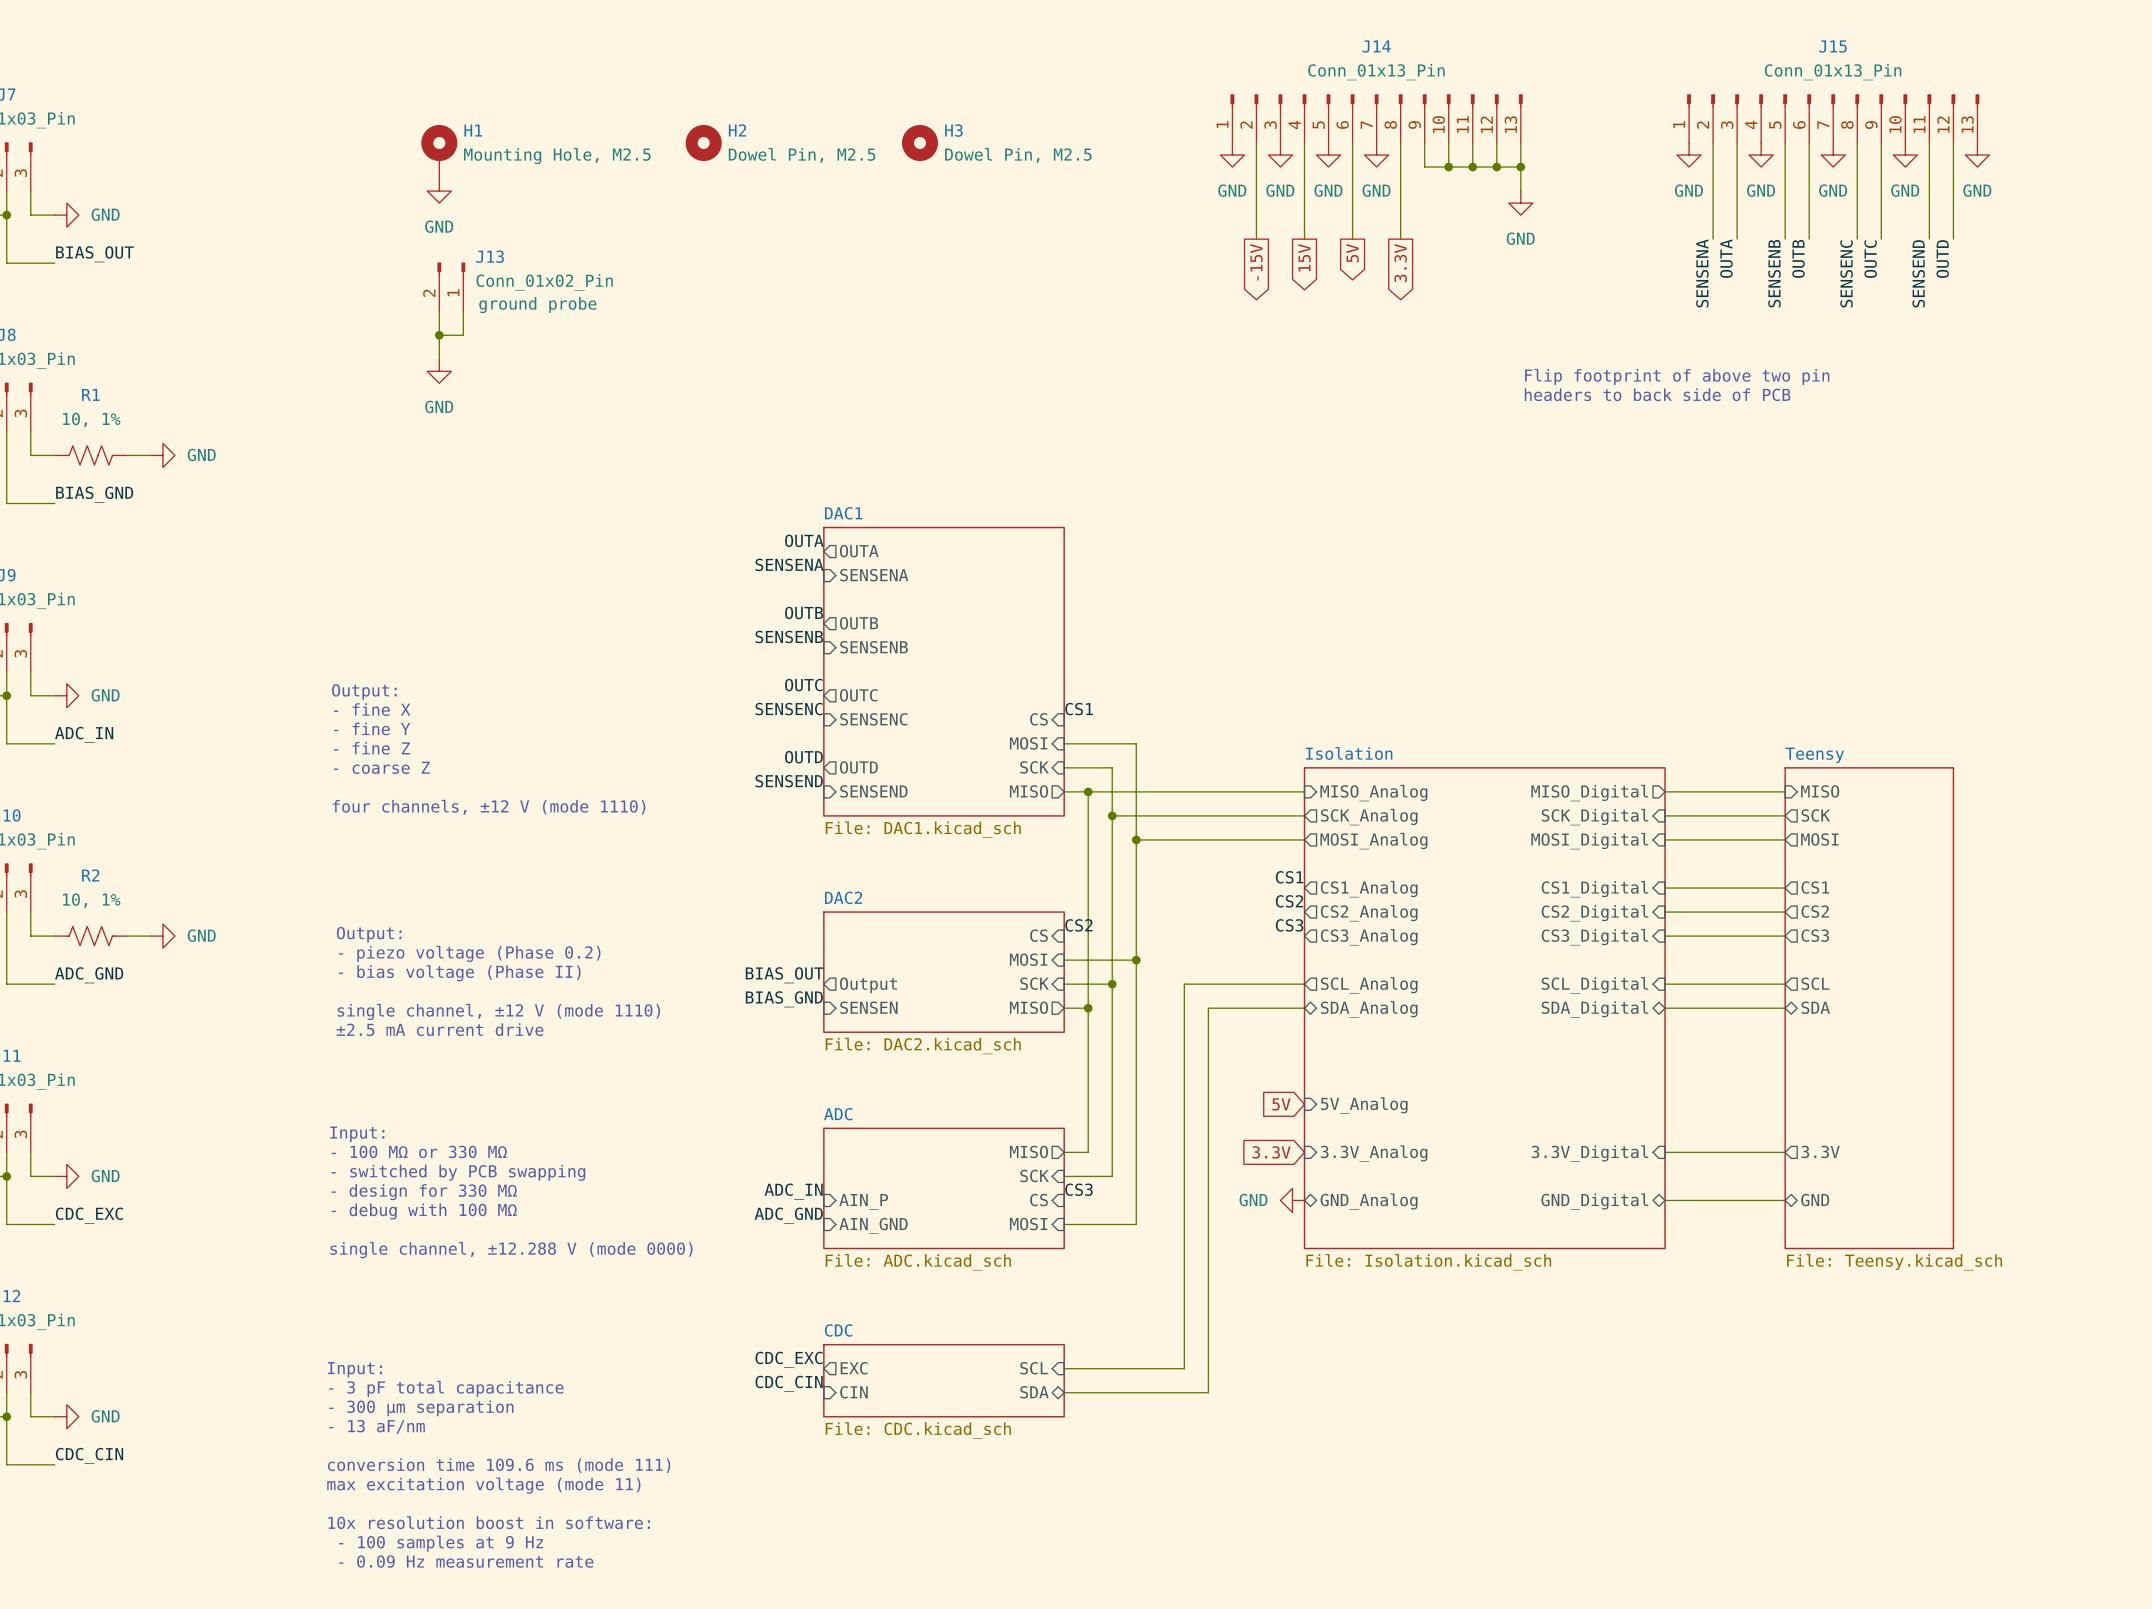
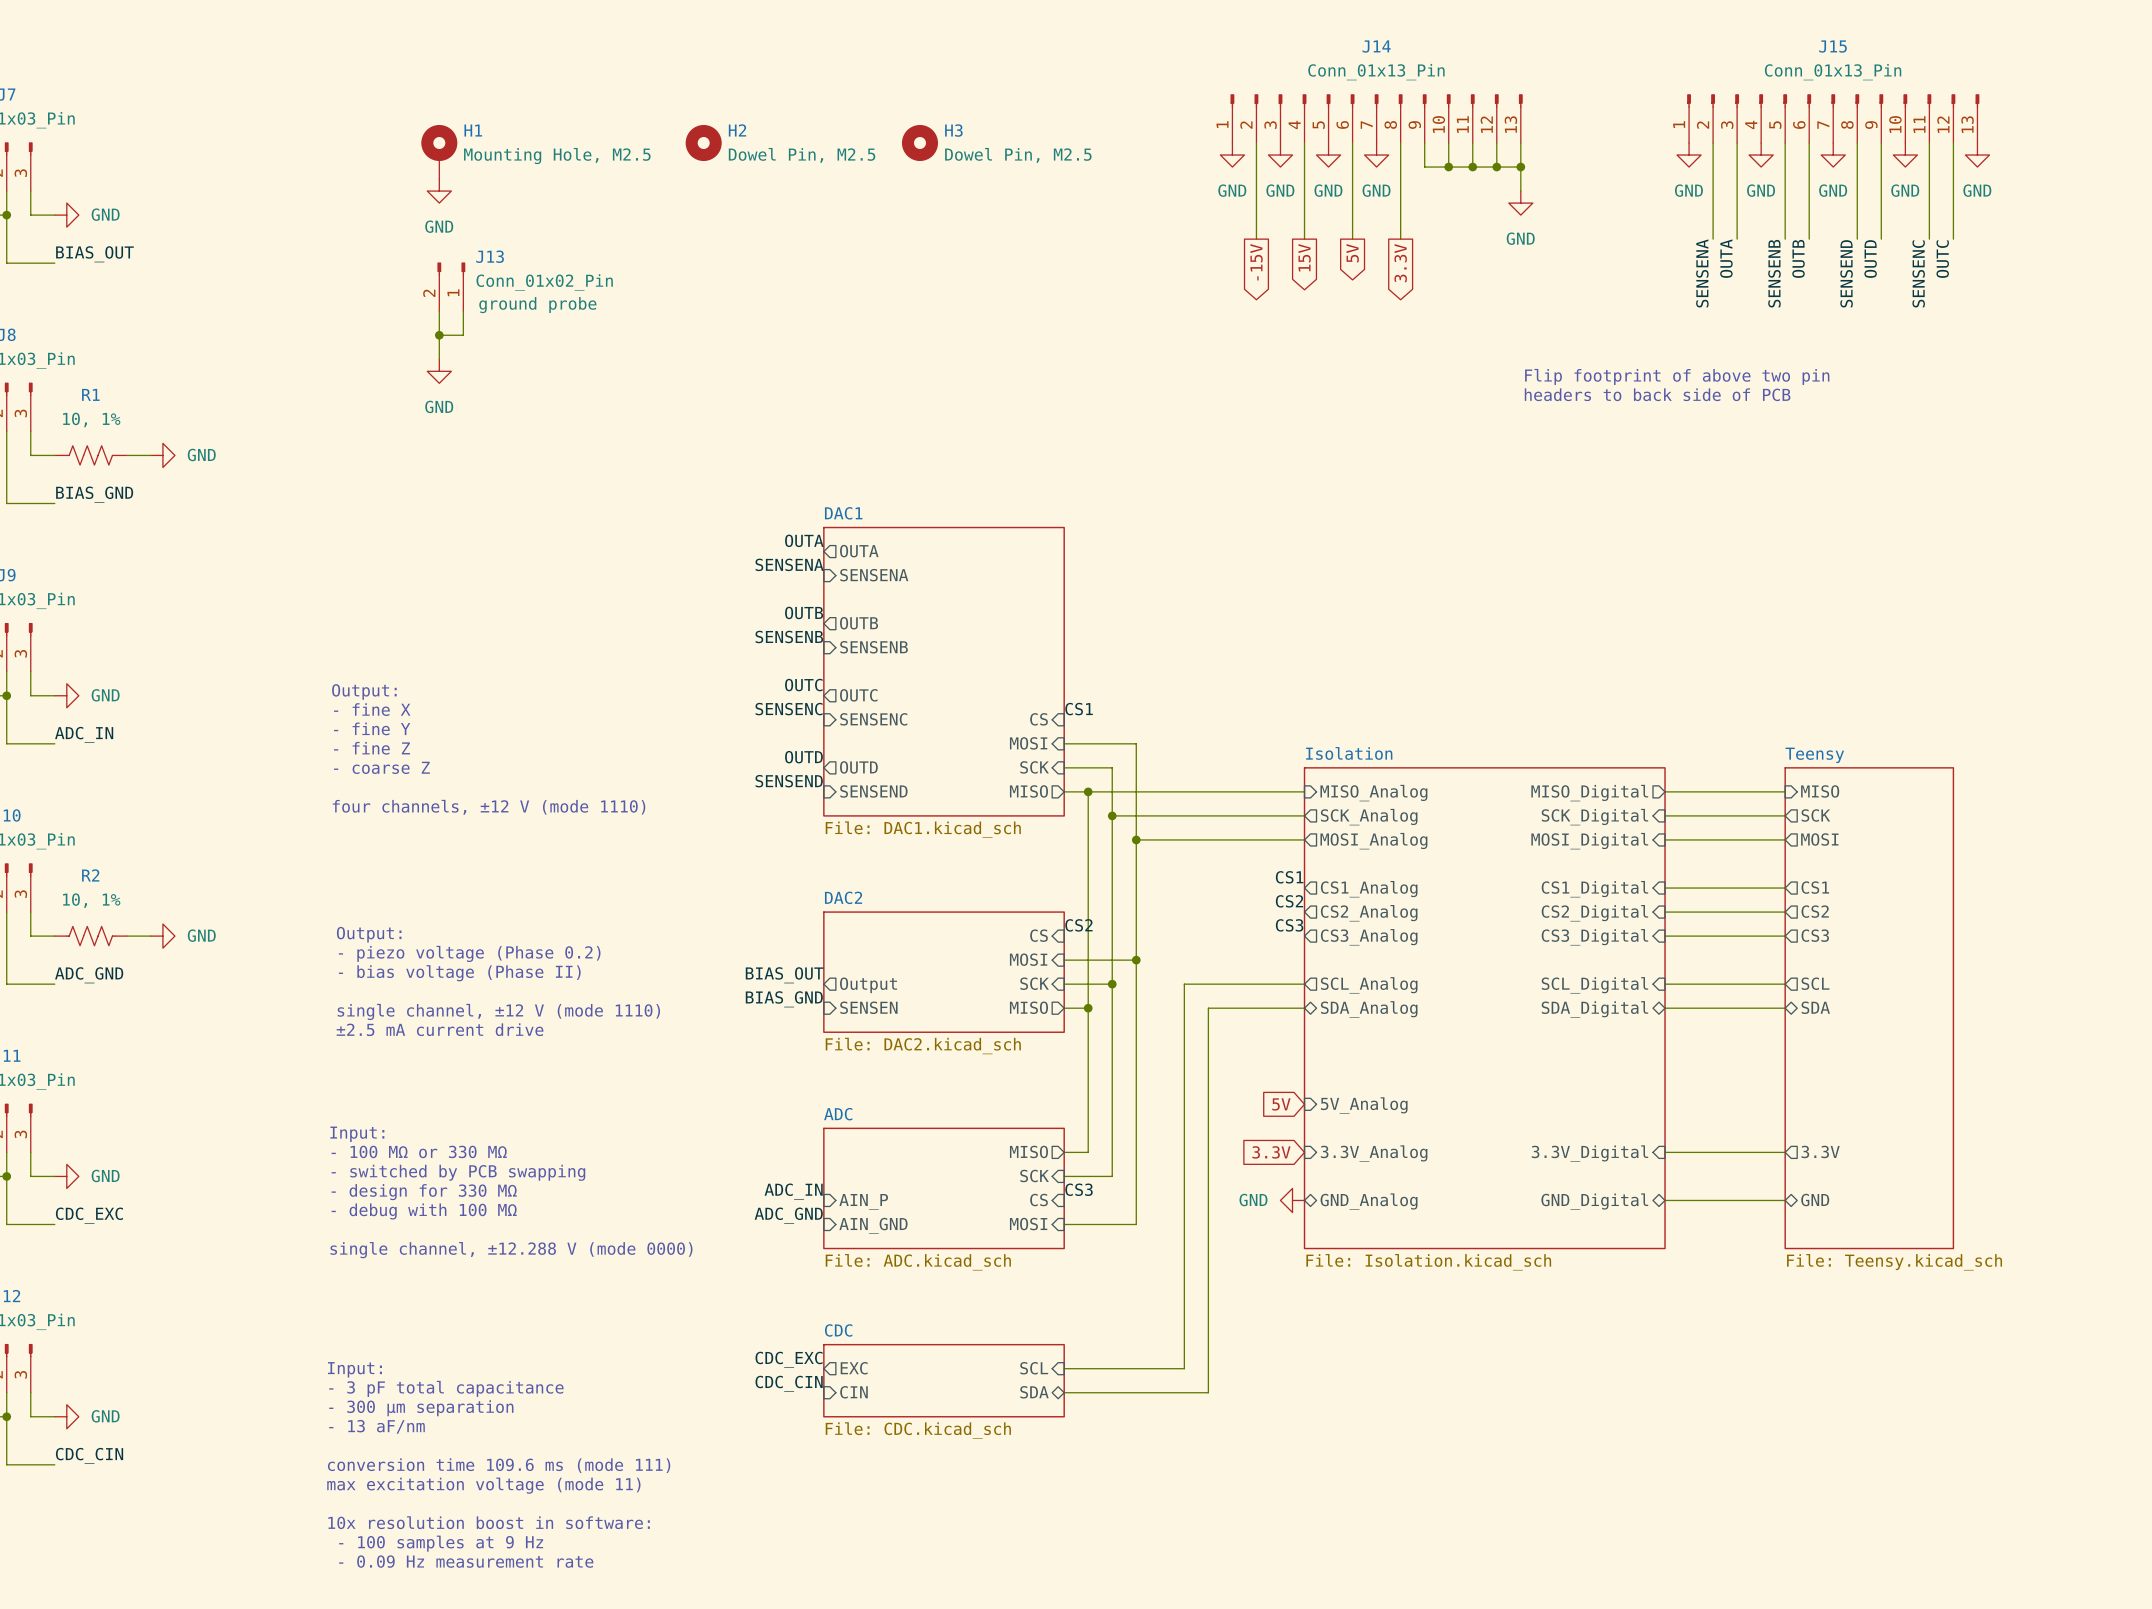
label: OUTC (1870, 259) -> OUTD (1870, 259)
label: OUTD (1942, 259) -> OUTC (1942, 259)
label: SENSENC (1846, 273) -> SENSEND (1846, 273)
label: SENSEND (1918, 273) -> SENSENC (1918, 273)

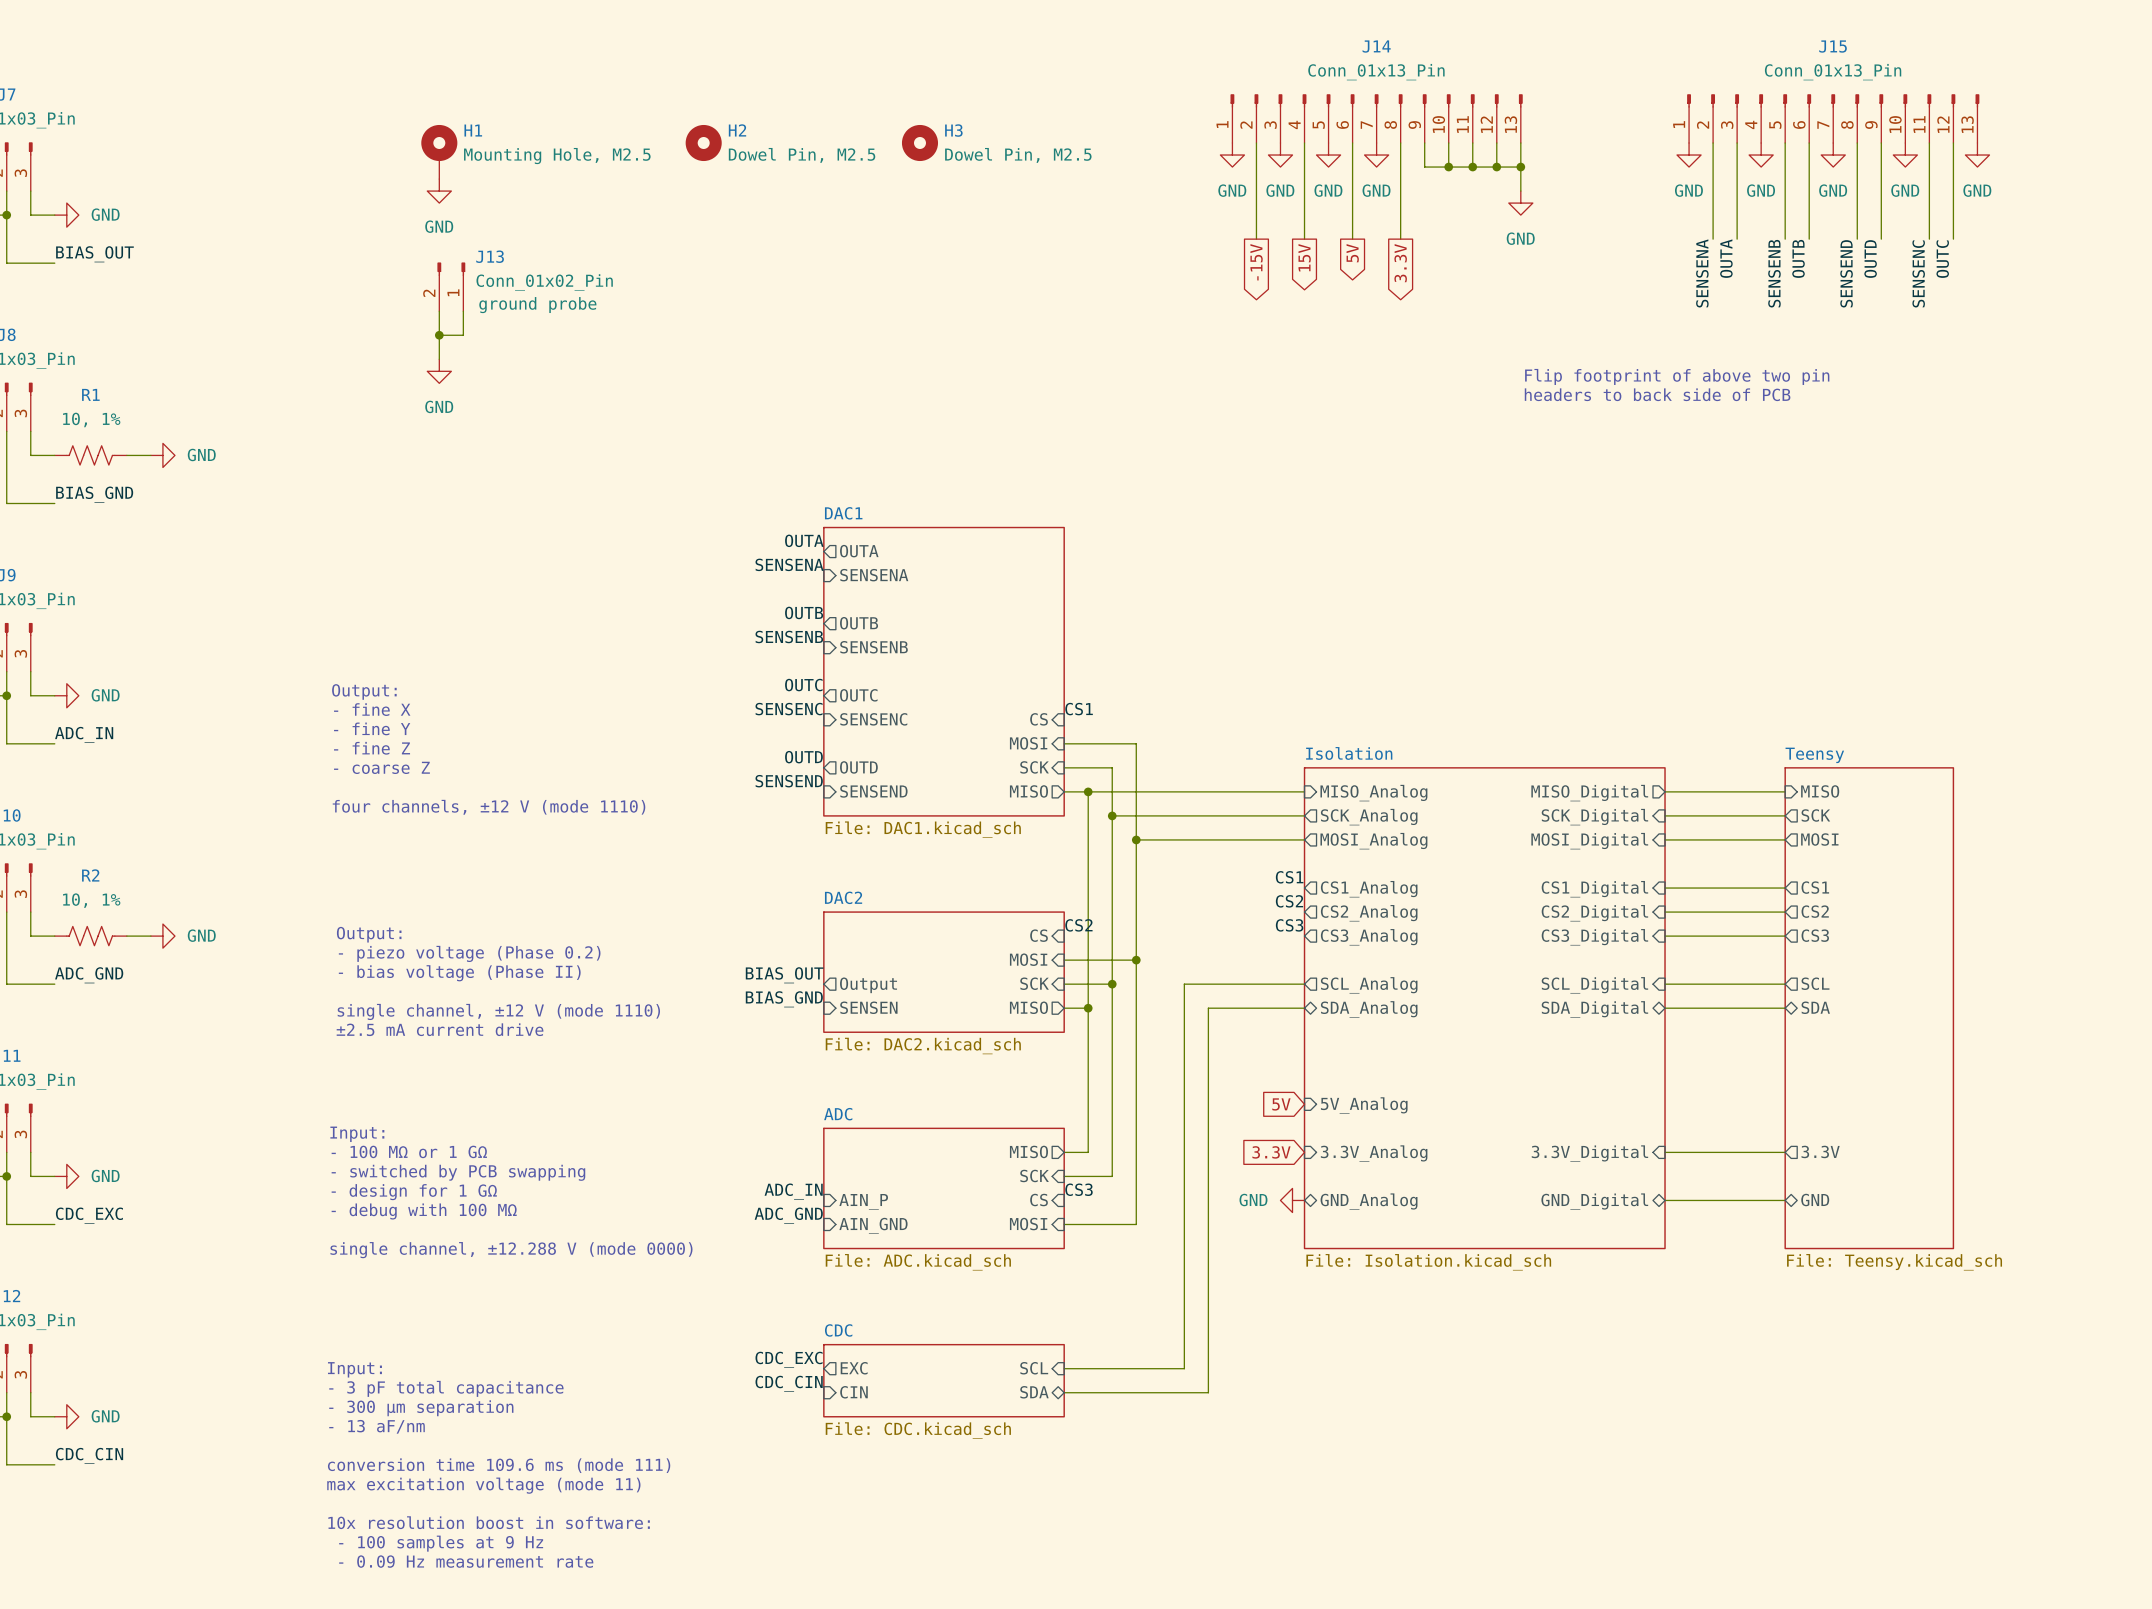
text: - 100 MΩ or 330 MΩ (419, 1151) -> - 100 MΩ or 1 GΩ (409, 1151)
text: - design for 330 MΩ (424, 1192) -> - design for 1 GΩ (414, 1192)

